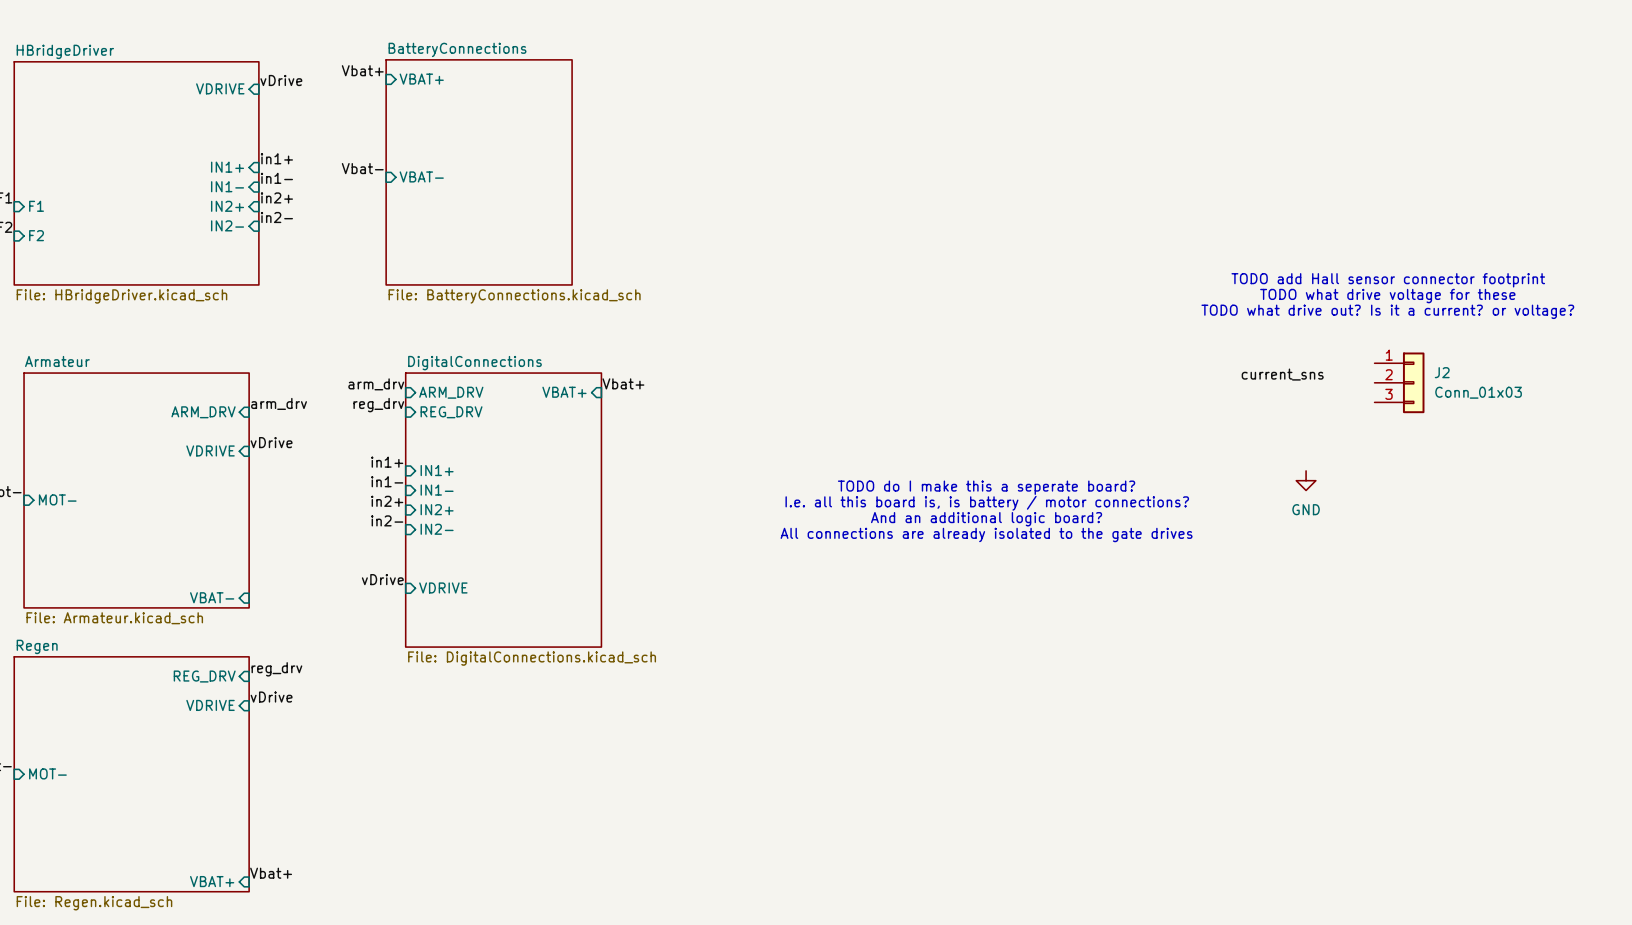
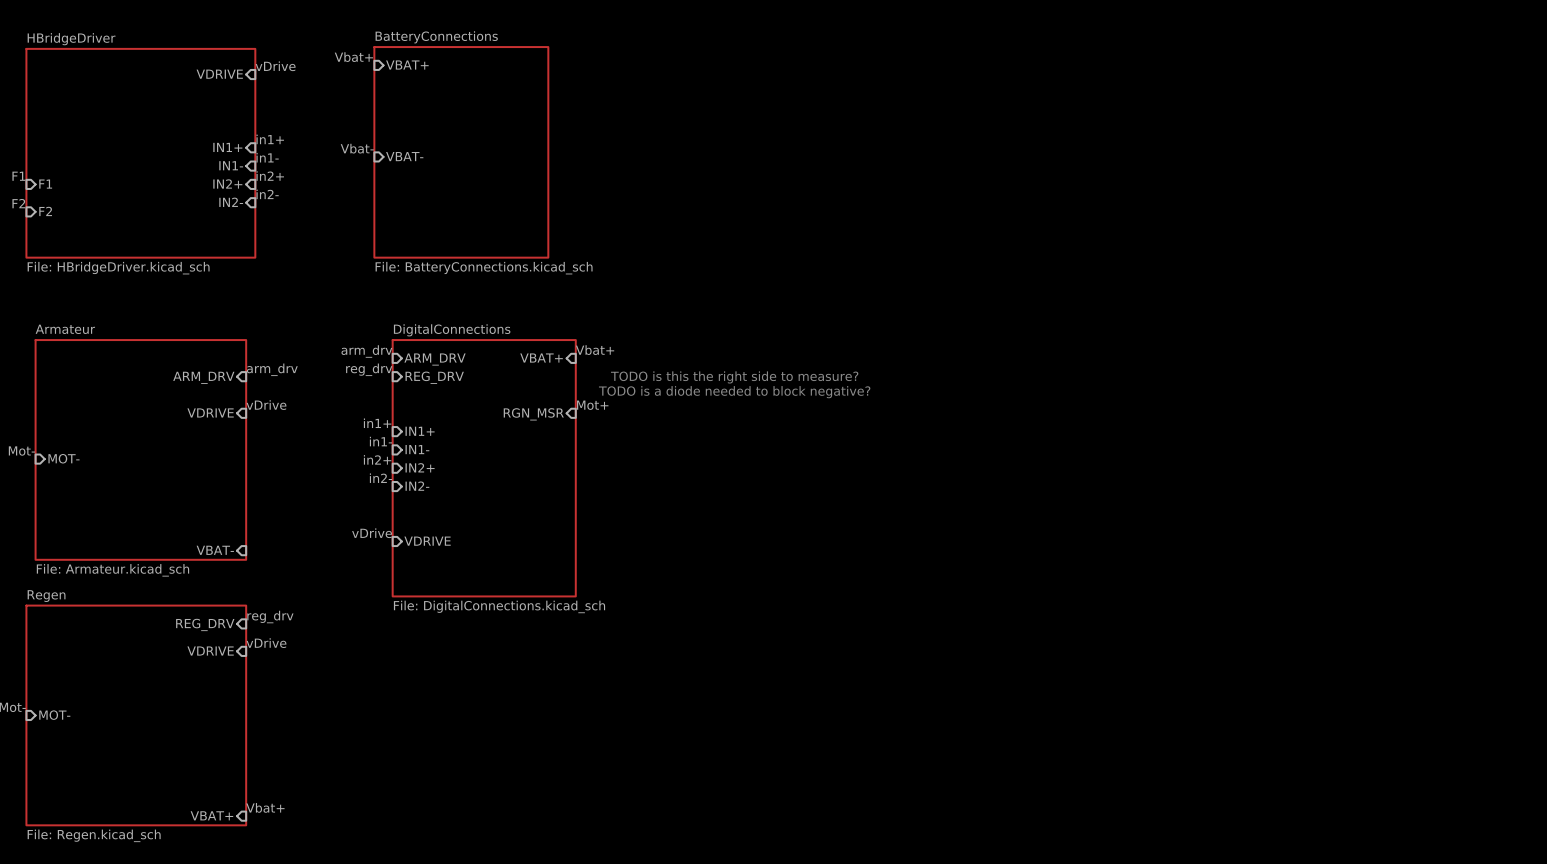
text: TODO add Hall sensor connector footprint (1388, 280) -> none
text: TODO what drive voltage for these (1387, 296) -> none
text: TODO what drive out? Is it a current? or voltage? (1387, 311) -> none
label: current_sns (1282, 374) -> none
J2: Conn_01x03 (1399, 382) -> none
text: none -> TODO is this the right side to measure? (734, 377)
text: none -> TODO is a diode needed to block negative? (734, 392)
label: none -> Mot+ (592, 405)
sheet pin: none -> RGN_MSR (533, 414)
power symbol: GND (1306, 480) -> none
text: TODO do I make this a seperate board? (986, 487) -> none
text: I.e. all this board is, is battery / motor connections? (987, 503) -> none
text: And an additional logic board? (986, 519) -> none
text: All connections are already isolated to the gate drives (986, 534) -> none

